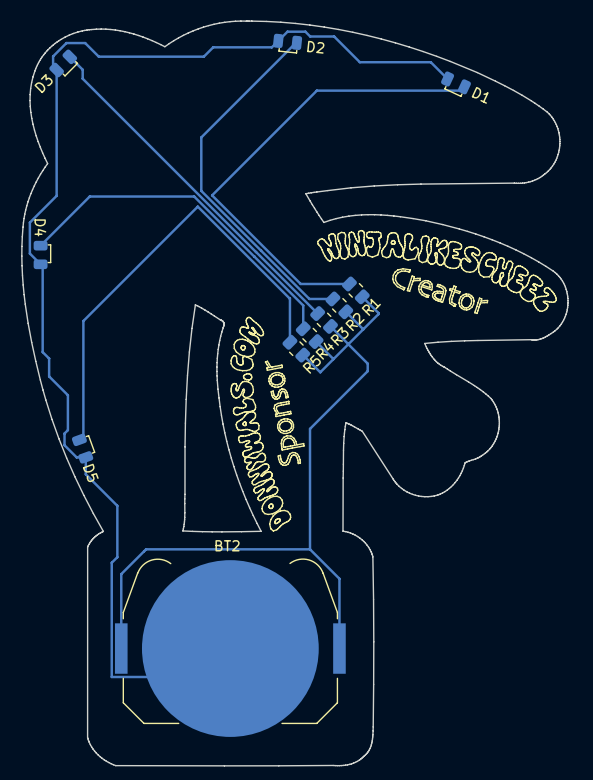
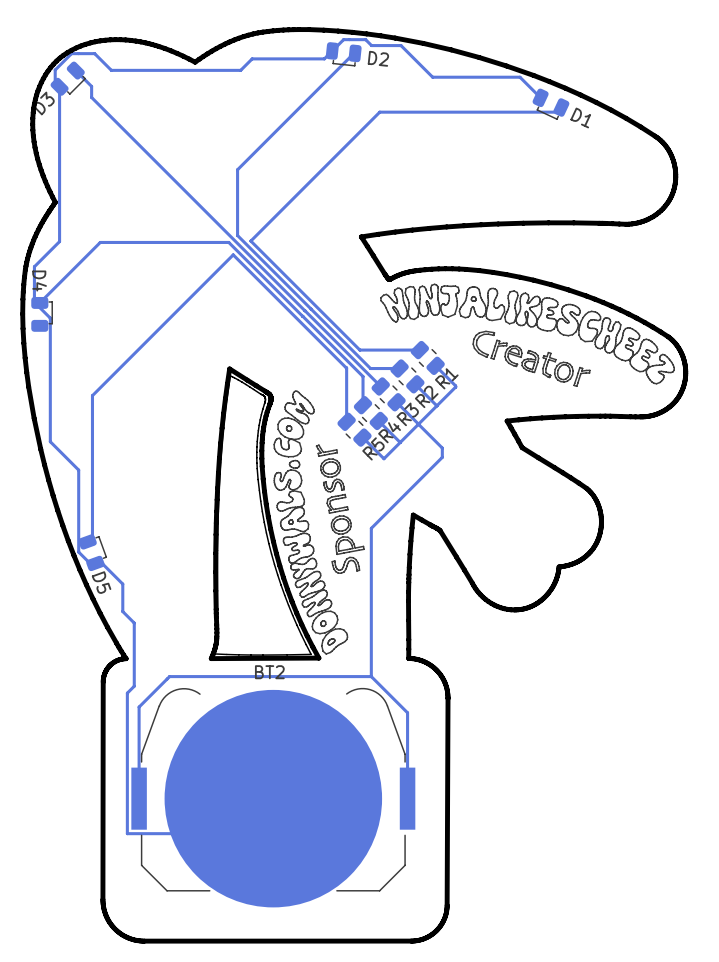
board edge: (240, 21) (203, 27) (183, 35) (164, 46) (143, 37) (120, 30) (96, 29) (77, 32) (60, 39) (46, 51) (37, 64) (31, 82) (30, 100) (31, 118) (38, 141) (47, 163) (32, 189) (24, 218) (21, 256) (25, 304) (35, 361) (52, 419) (74, 476) (103, 531) (94, 537) (87, 547) (87, 737) (98, 754) (115, 765) (341, 765) (355, 762) (366, 754) (371, 744) (373, 730) (372, 556) (368, 547) (361, 539) (343, 531) (343, 450) (345, 422) (362, 431) (394, 480) (401, 488) (421, 496) (434, 495) (442, 493) (456, 480) (465, 462) (479, 456) (492, 445) (498, 433) (498, 416) (490, 398) (477, 387) (437, 362) (424, 343) (539, 339) (558, 327) (564, 318) (567, 307) (566, 289) (558, 275) (538, 261) (508, 246) (459, 228) (400, 216) (355, 215) (323, 222) (305, 193) (374, 185) (520, 183) (532, 181) (549, 169) (559, 150) (557, 128) (547, 112) (522, 95) (477, 72) (395, 42) (324, 27) (280, 22) (240, 21) -> none
bottom track: (36, 216) (29, 222) (29, 253) (42, 266) (42, 352) (49, 358) -> (34, 266) (34, 302) (50, 318) (50, 441) (78, 470) (78, 552) (88, 561)
board edge: none -> (389, 279) (415, 270) (465, 269) (533, 280) (586, 295) (636, 318) (672, 340) (679, 349) (684, 361) (685, 375) (683, 388) (677, 398) (670, 406) (650, 416) (565, 416) (507, 421) (522, 447) (588, 490) (596, 501) (600, 514) (600, 533) (592, 549) (577, 561) (559, 566) (556, 578) (551, 589) (541, 599) (531, 606) (520, 609) (507, 609) (497, 606) (485, 599) (475, 589) (440, 530) (413, 515) (409, 574) (408, 658) (422, 660) (435, 668) (444, 681) (447, 696) (447, 907) (444, 919) (436, 930) (425, 938) (411, 941) (144, 941) (128, 937) (118, 931) (109, 922) (104, 911) (102, 899) (103, 679) (105, 671) (110, 664) (118, 660) (126, 658) (93, 599) (62, 525) (40, 449) (25, 357) (22, 313) (25, 266) (36, 233) (55, 202) (39, 164) (32, 130) (35, 99) (45, 74) (56, 61) (71, 50) (85, 44) (105, 40) (125, 39) (148, 43) (171, 50) (195, 62) (229, 41) (262, 32) (309, 29) (366, 33) (451, 49) (506, 66) (549, 81) (596, 102) (640, 126) (660, 140) (671, 156) (675, 177) (670, 197) (656, 214) (637, 222) (481, 224) (412, 230) (361, 236) (389, 279)
board edge: none -> (270, 402) (269, 393) (229, 368) (218, 473) (215, 553) (216, 636) (211, 658) (318, 658) (301, 624) (287, 589) (276, 553) (268, 516) (261, 450) (264, 423) (270, 403)
bottom track: (49, 358) (49, 376) (67, 395) (67, 430) (64, 433) (64, 445) (76, 457) (85, 457) (85, 474) (108, 496) -> (100, 561) (122, 584) (122, 611)

